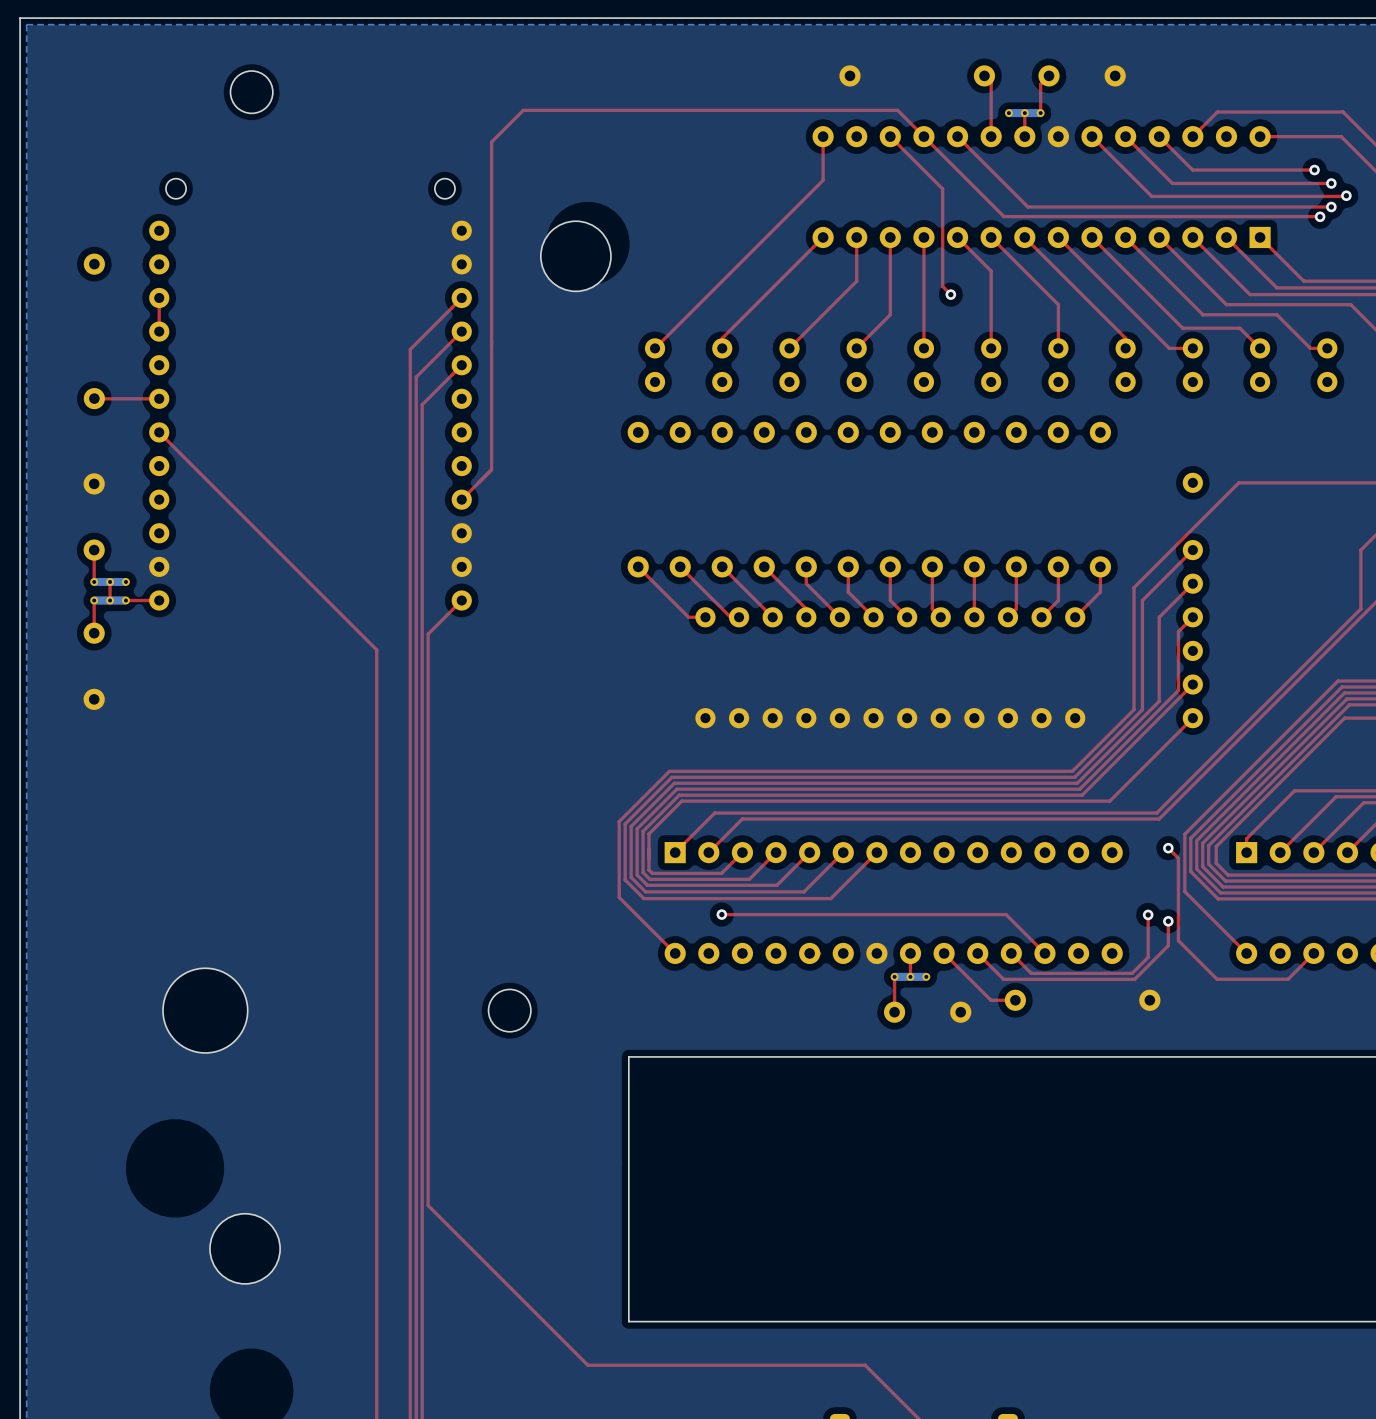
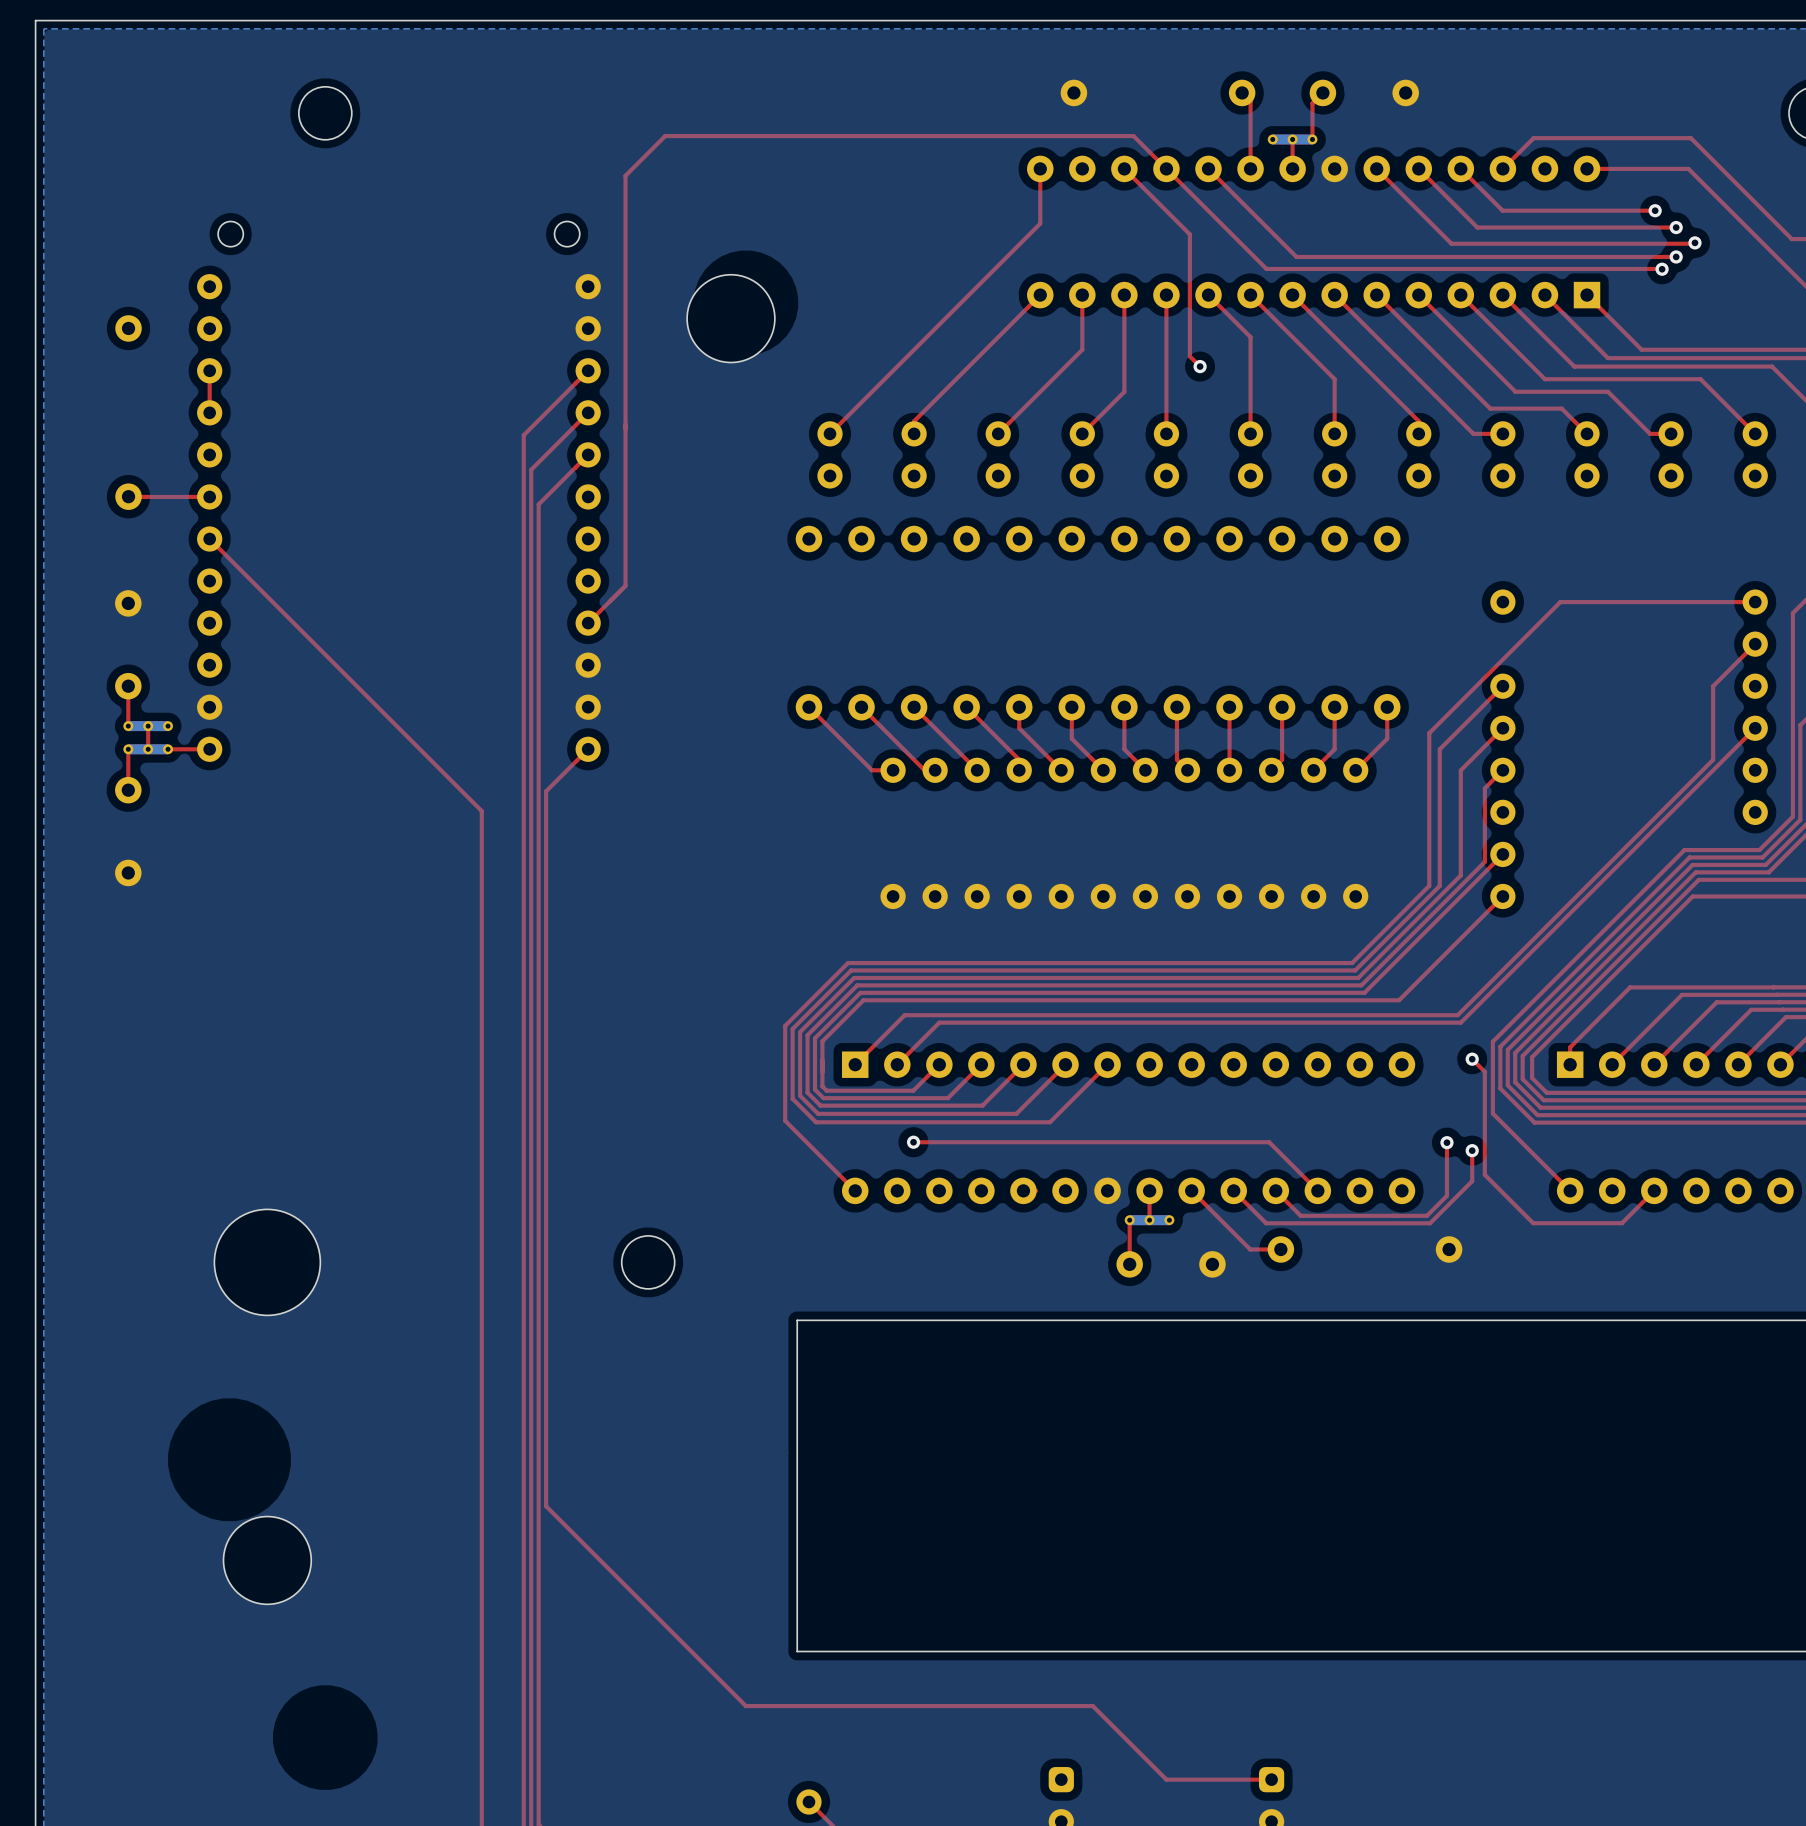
part position: (245, 1248) -> (267, 1560)

